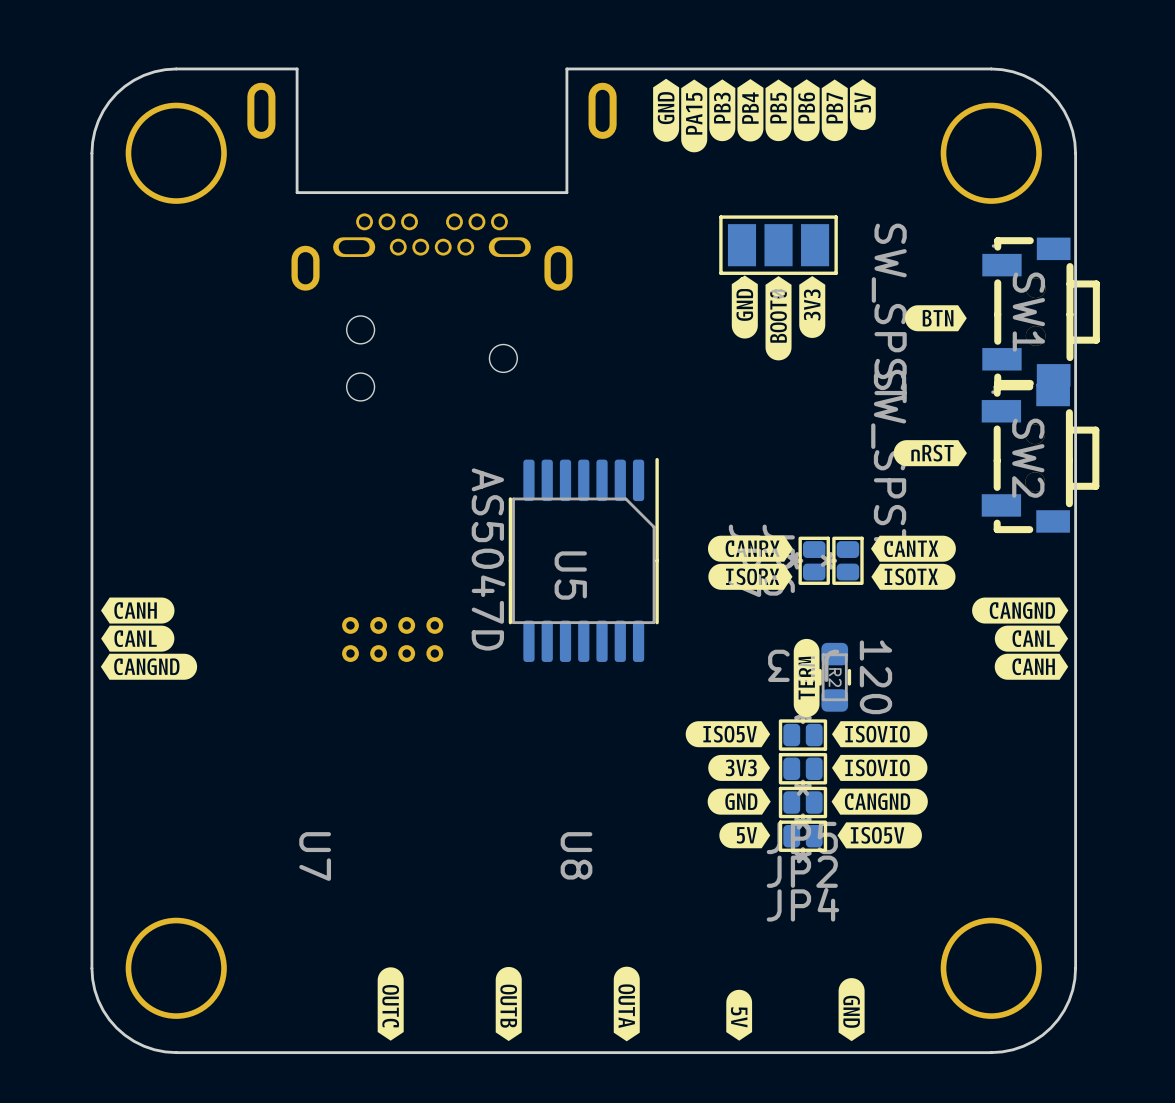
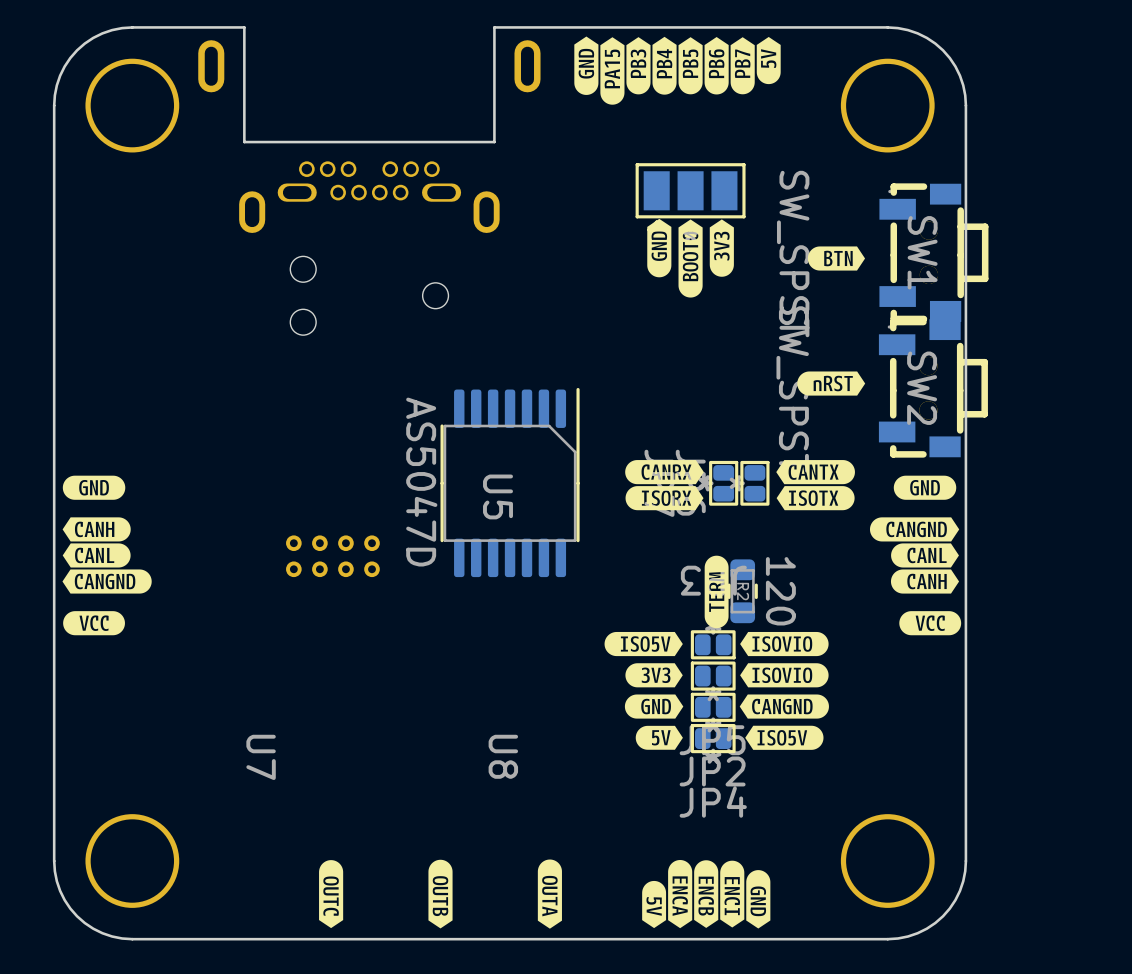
drawing: none -> [62, 475, 126, 500]
drawing: none -> [893, 475, 957, 500]
drawing: none -> [63, 611, 125, 636]
drawing: none -> [899, 611, 962, 636]
drawing: none -> [668, 860, 745, 929]

